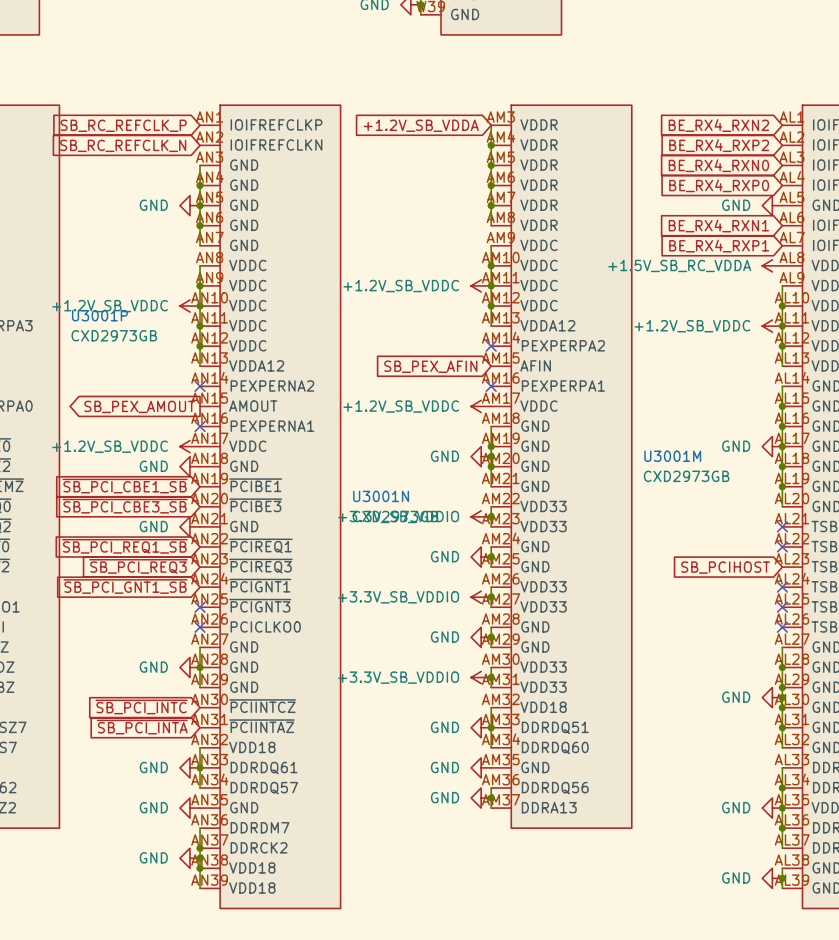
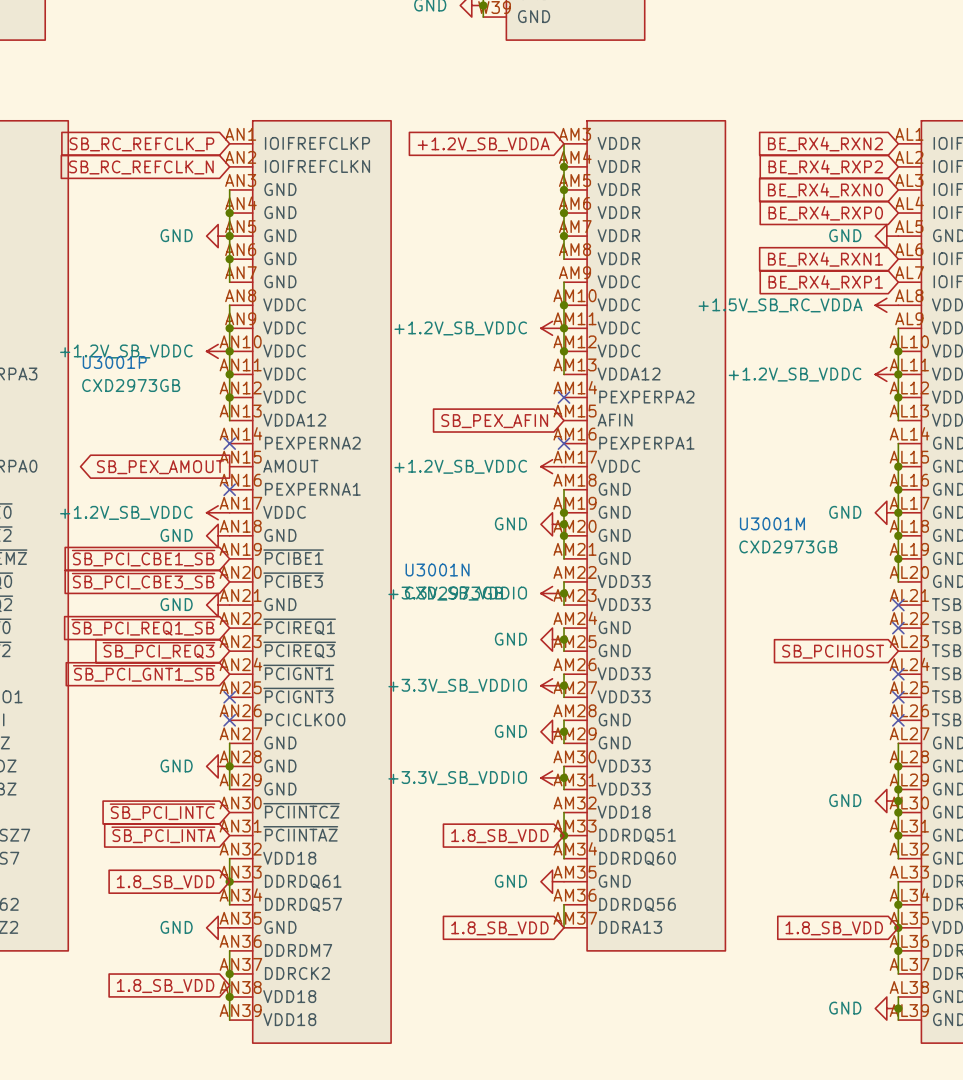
power symbol: GND (481, 727) -> none
global label: none -> 1.8_SB_VDD (499, 836)
power symbol: GND (189, 767) -> none
global label: none -> 1.8_SB_VDD (165, 882)
power symbol: GND (481, 798) -> none
junction: (491, 798) -> none
global label: none -> 1.8_SB_VDD (499, 928)
global label: none -> 1.8_SB_VDD (834, 928)
power symbol: GND (772, 808) -> none
global label: none -> 1.8_SB_VDD (165, 986)
power symbol: GND (189, 858) -> none
junction: (200, 858) -> none

